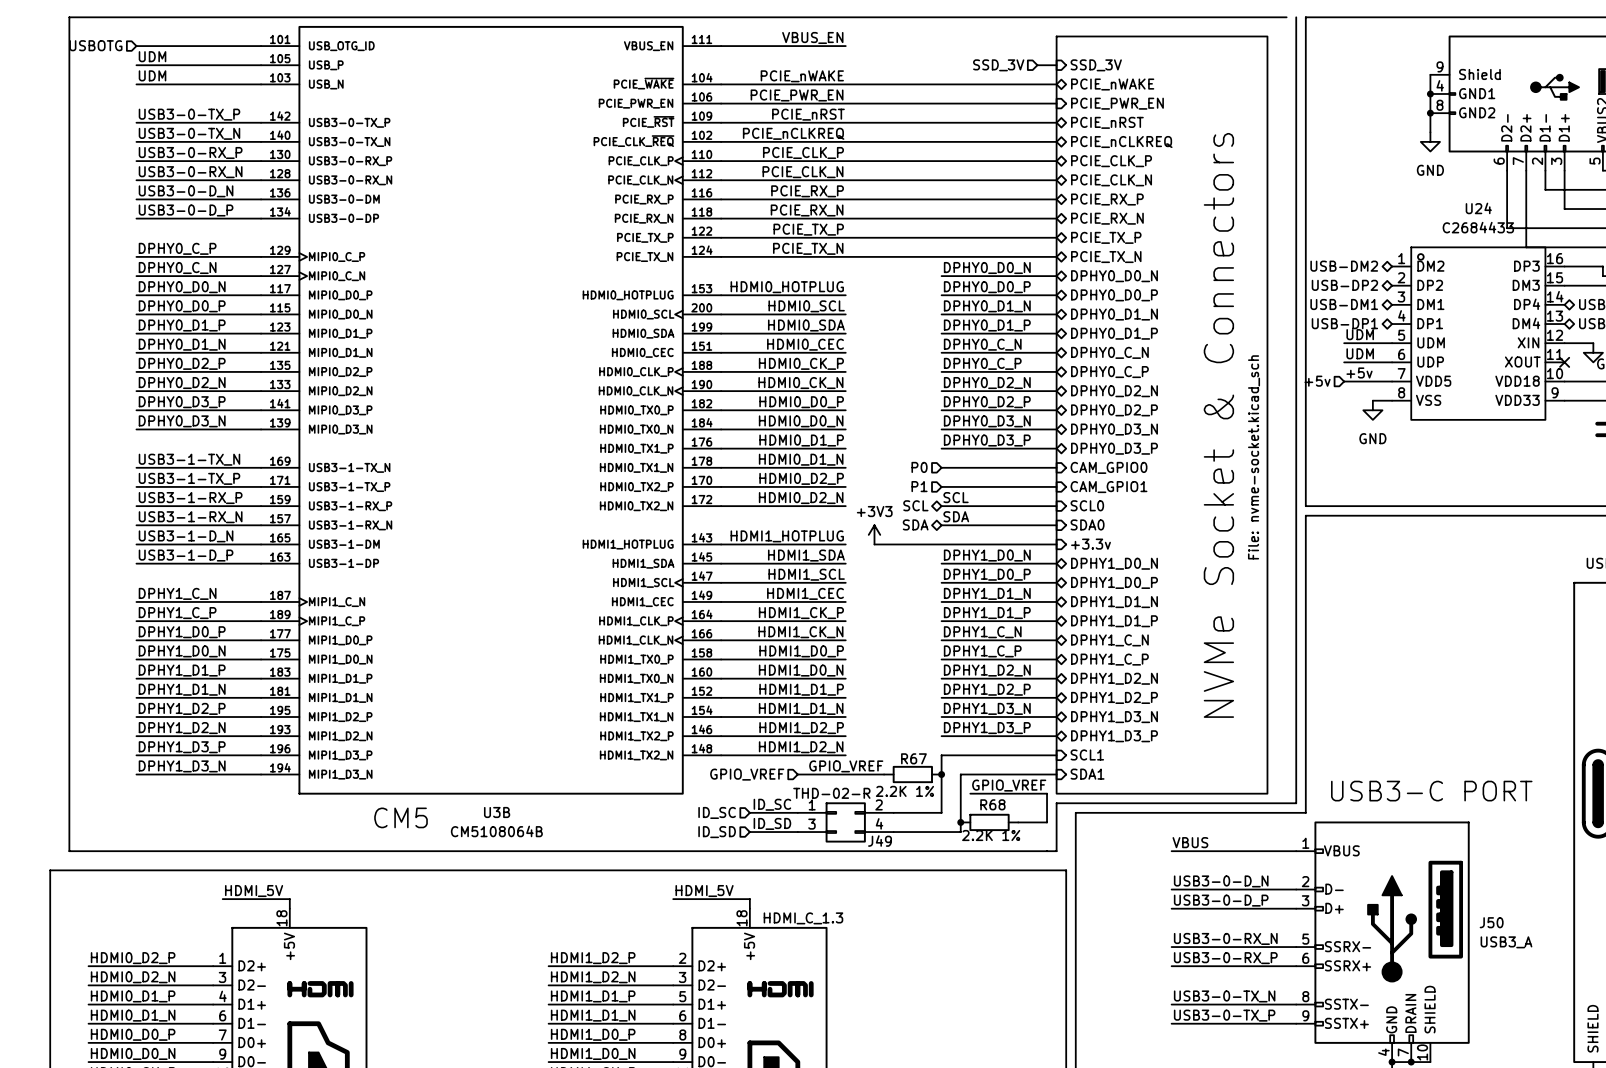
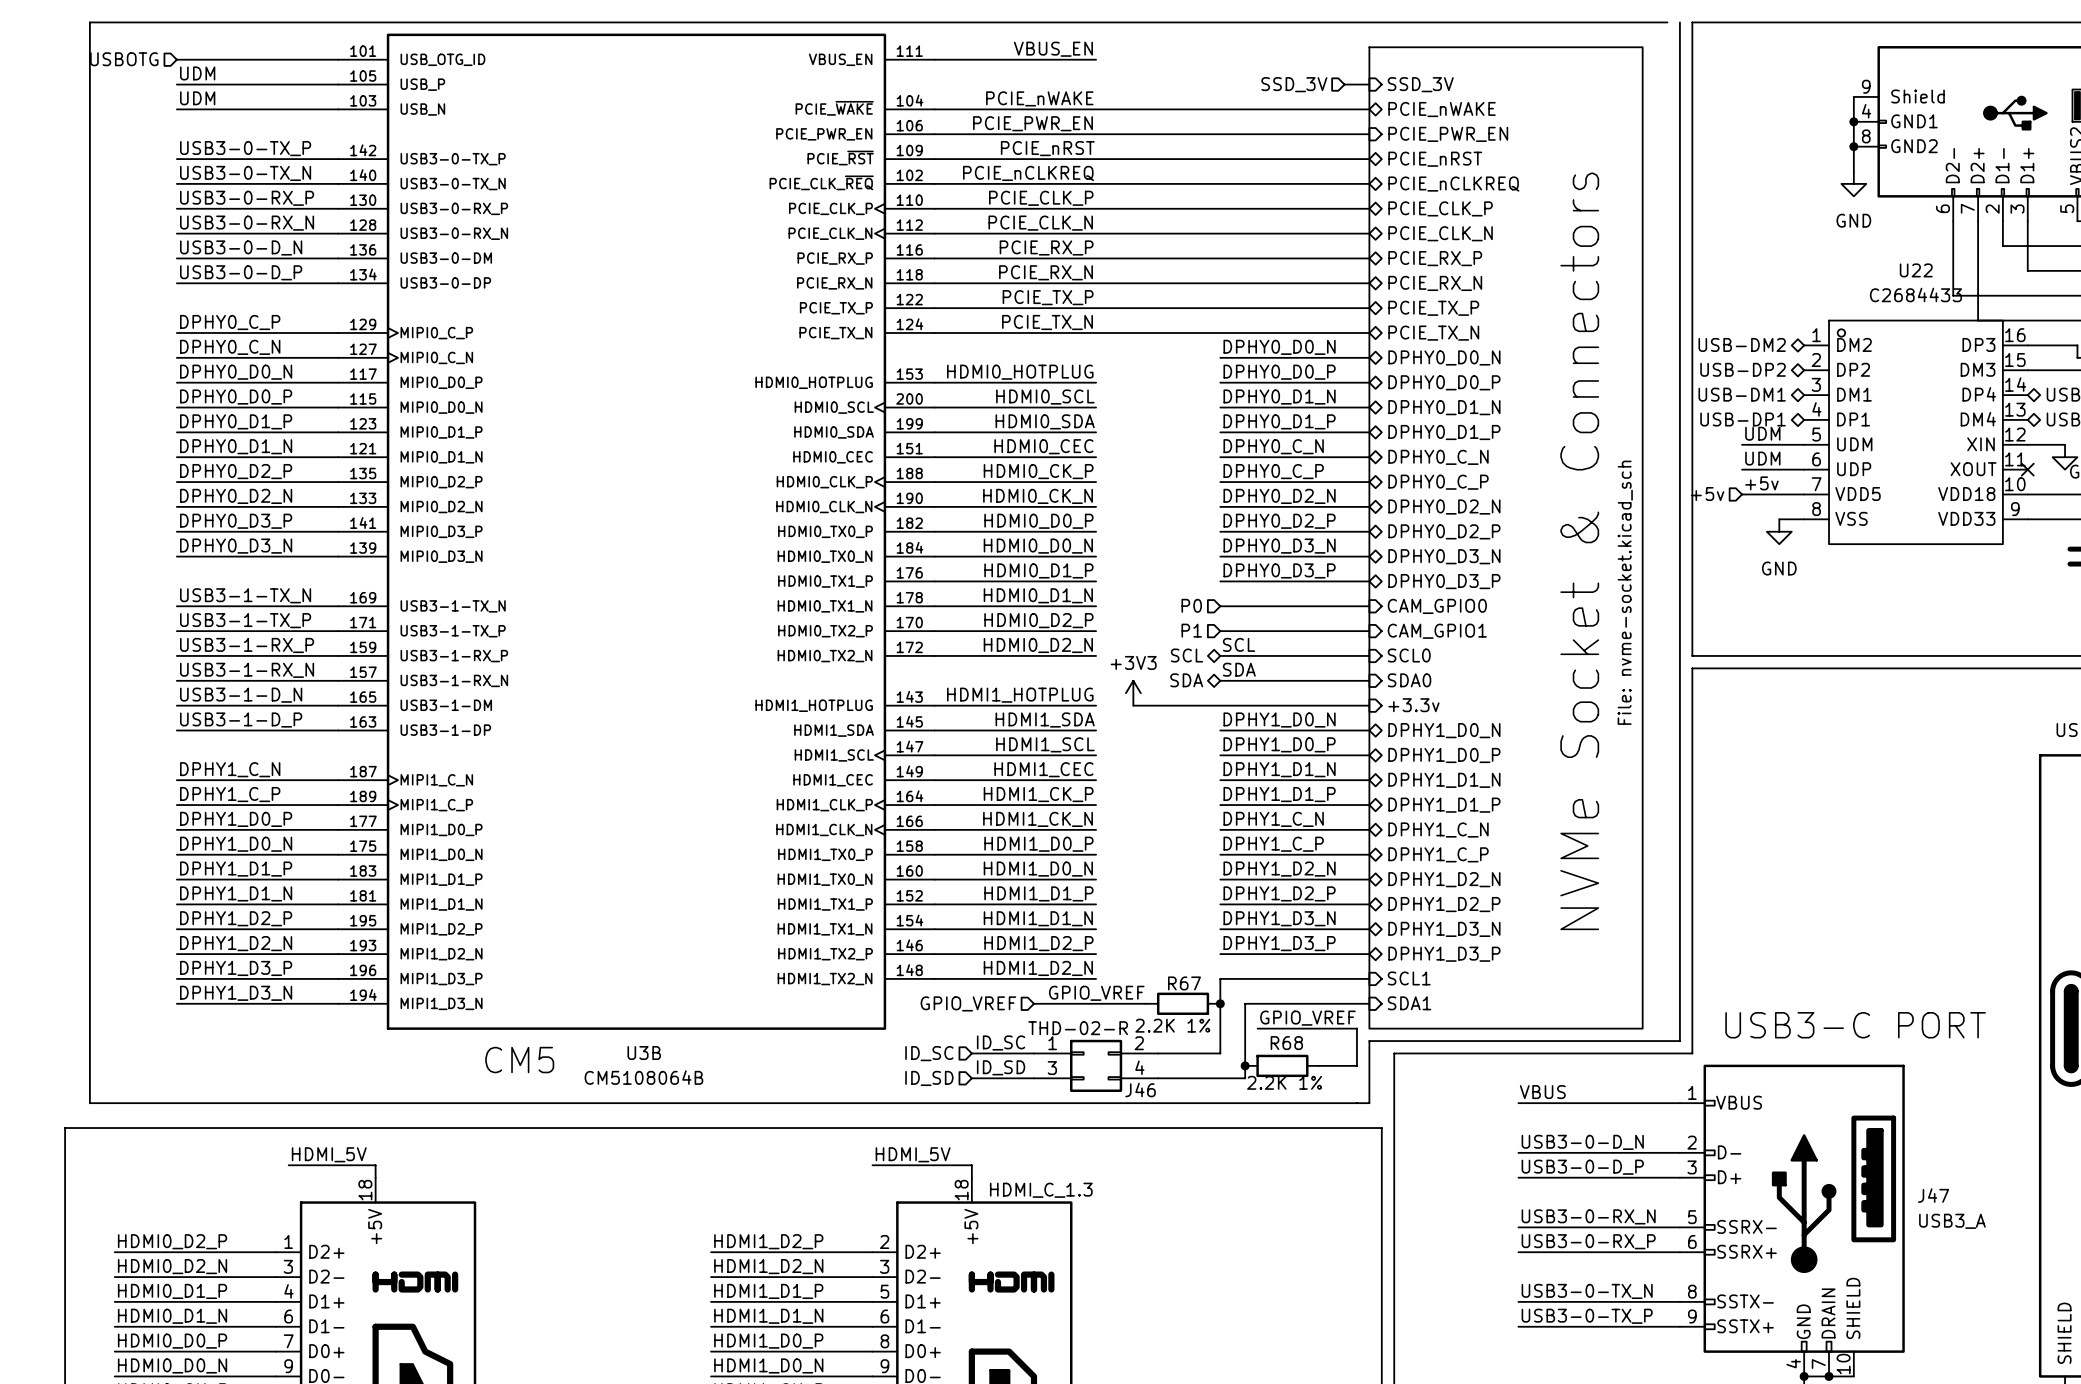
U24 name: U24 (1478, 208) -> U22 (1916, 270)
J49 name: J49 (880, 841) -> J46 (1140, 1089)
J50 name: J50 (1491, 922) -> J47 (1933, 1195)

